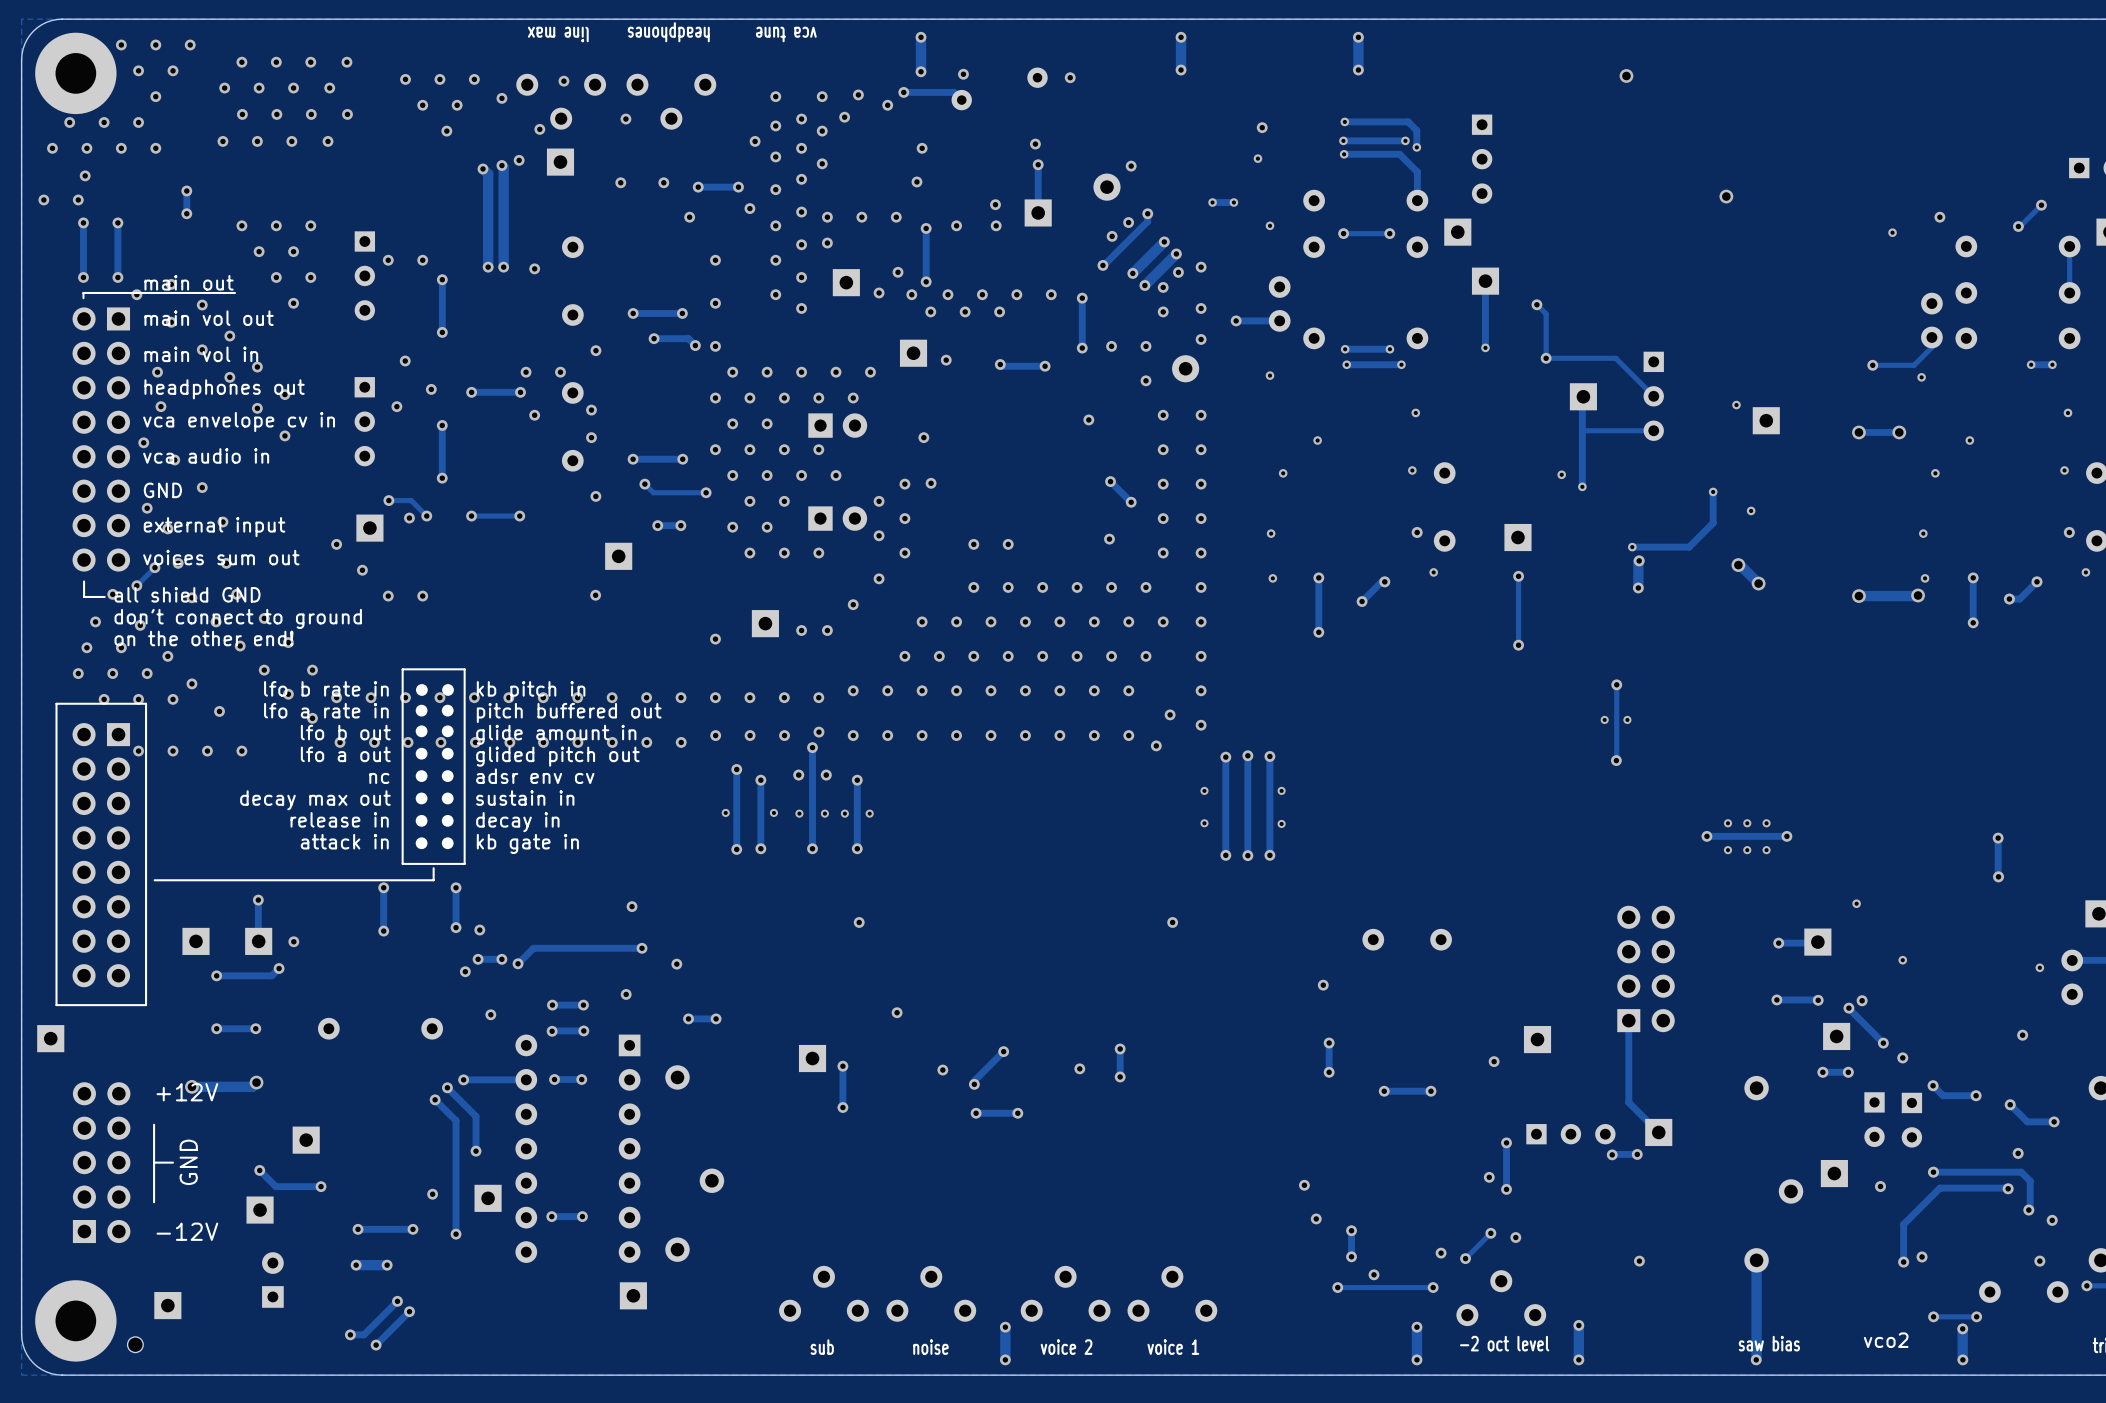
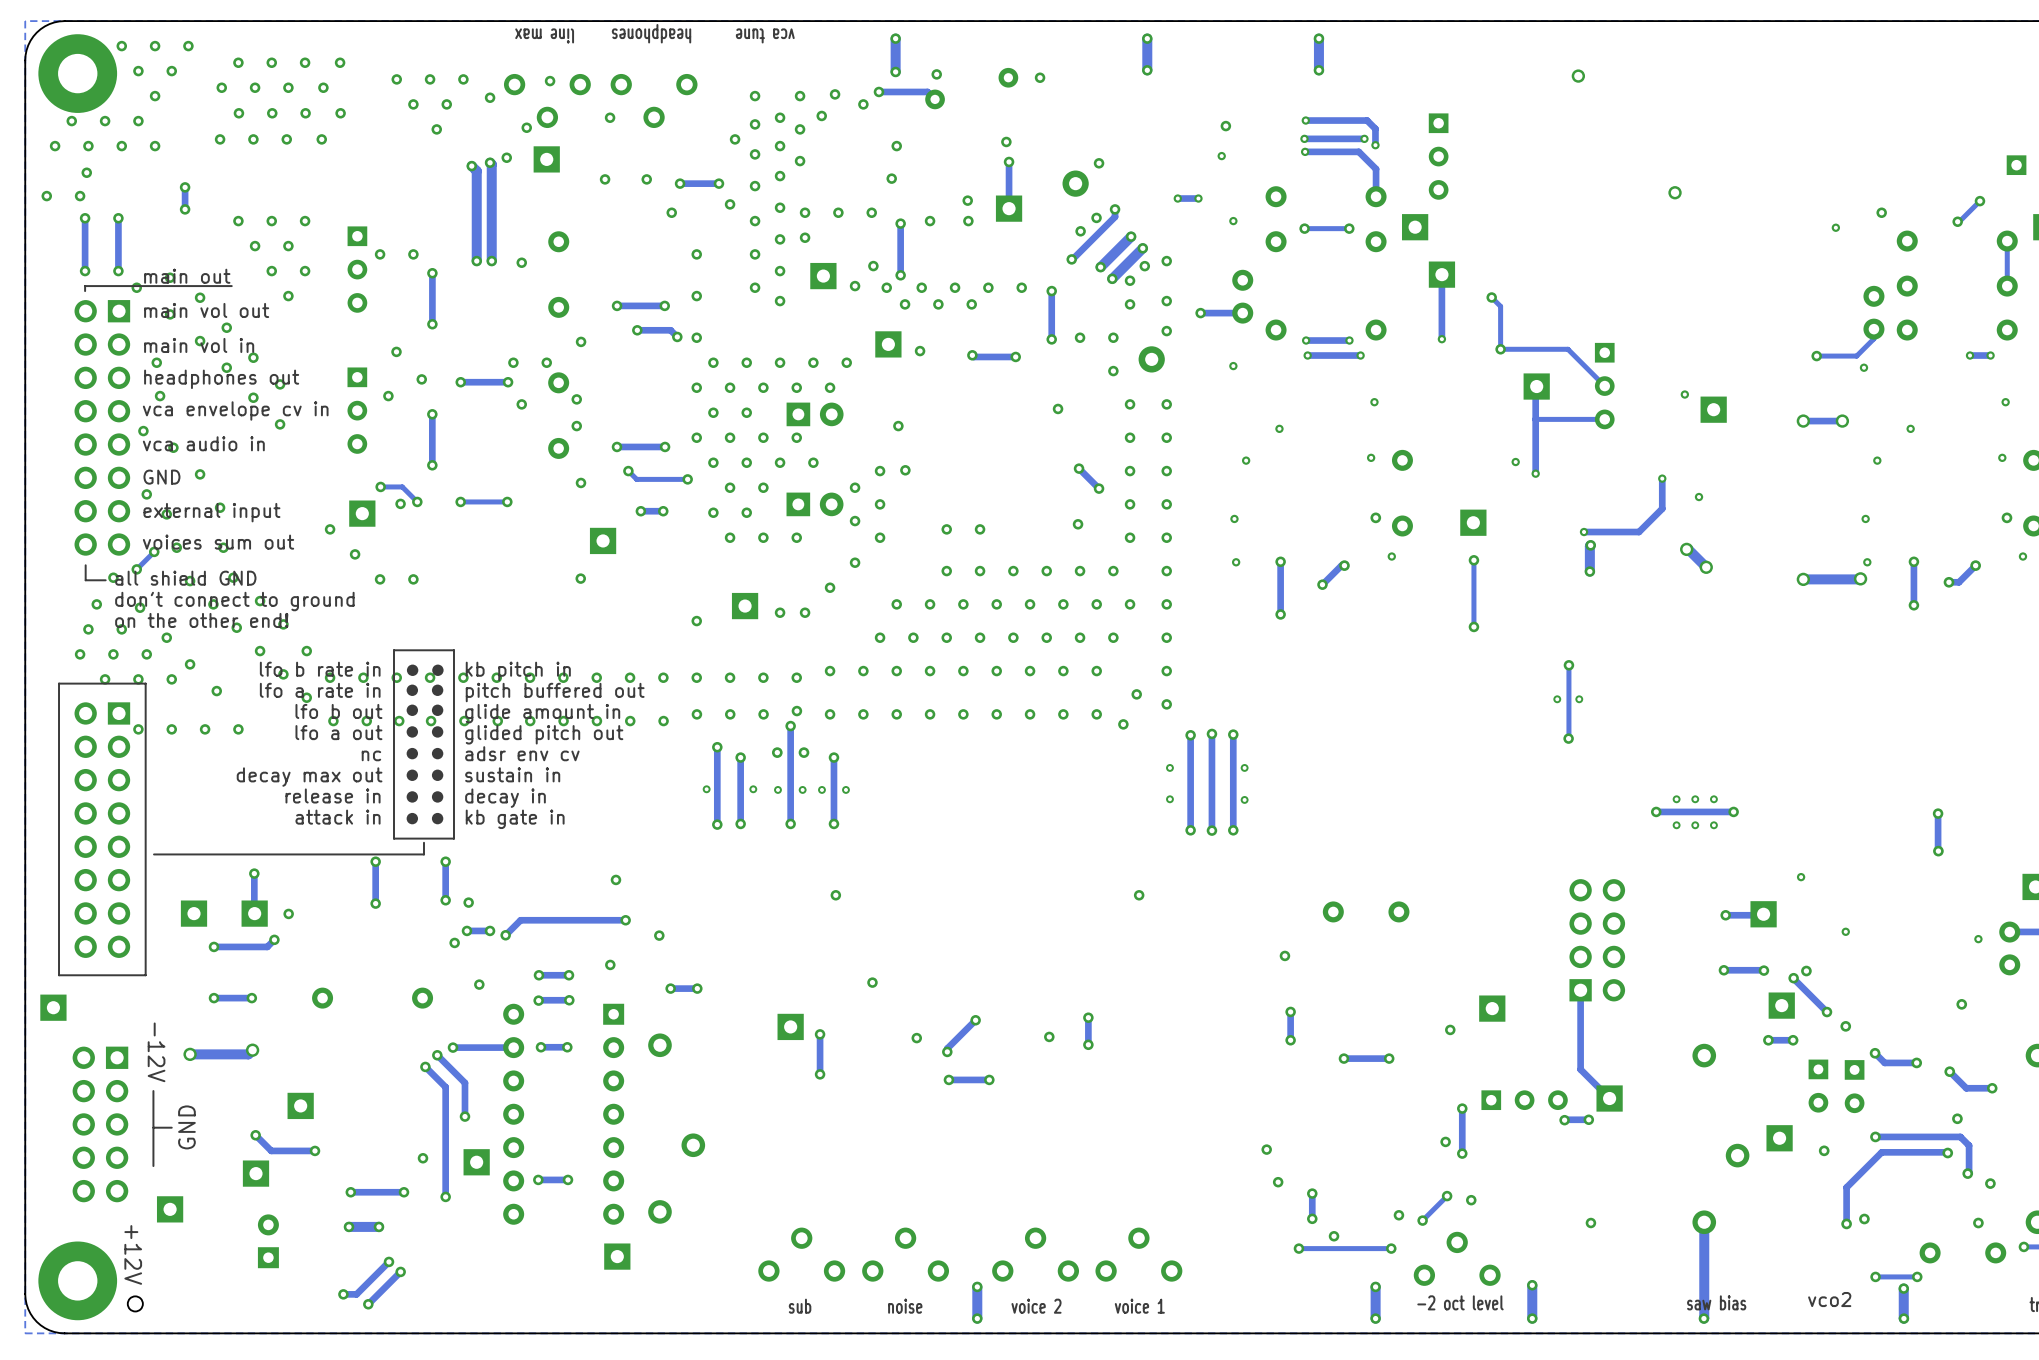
text rotation: 0° (187, 1092) -> 90° clockwise (133, 1254)
text position: +12V (187, 1092) -> +12V (133, 1254)
part rotation: 0° (101, 1162) -> 180° (100, 1124)
text rotation: 0° (187, 1231) -> 90° clockwise (156, 1052)
text position: -12V (187, 1231) -> -12V (156, 1052)
part position: (167, 1305) -> (170, 1209)

